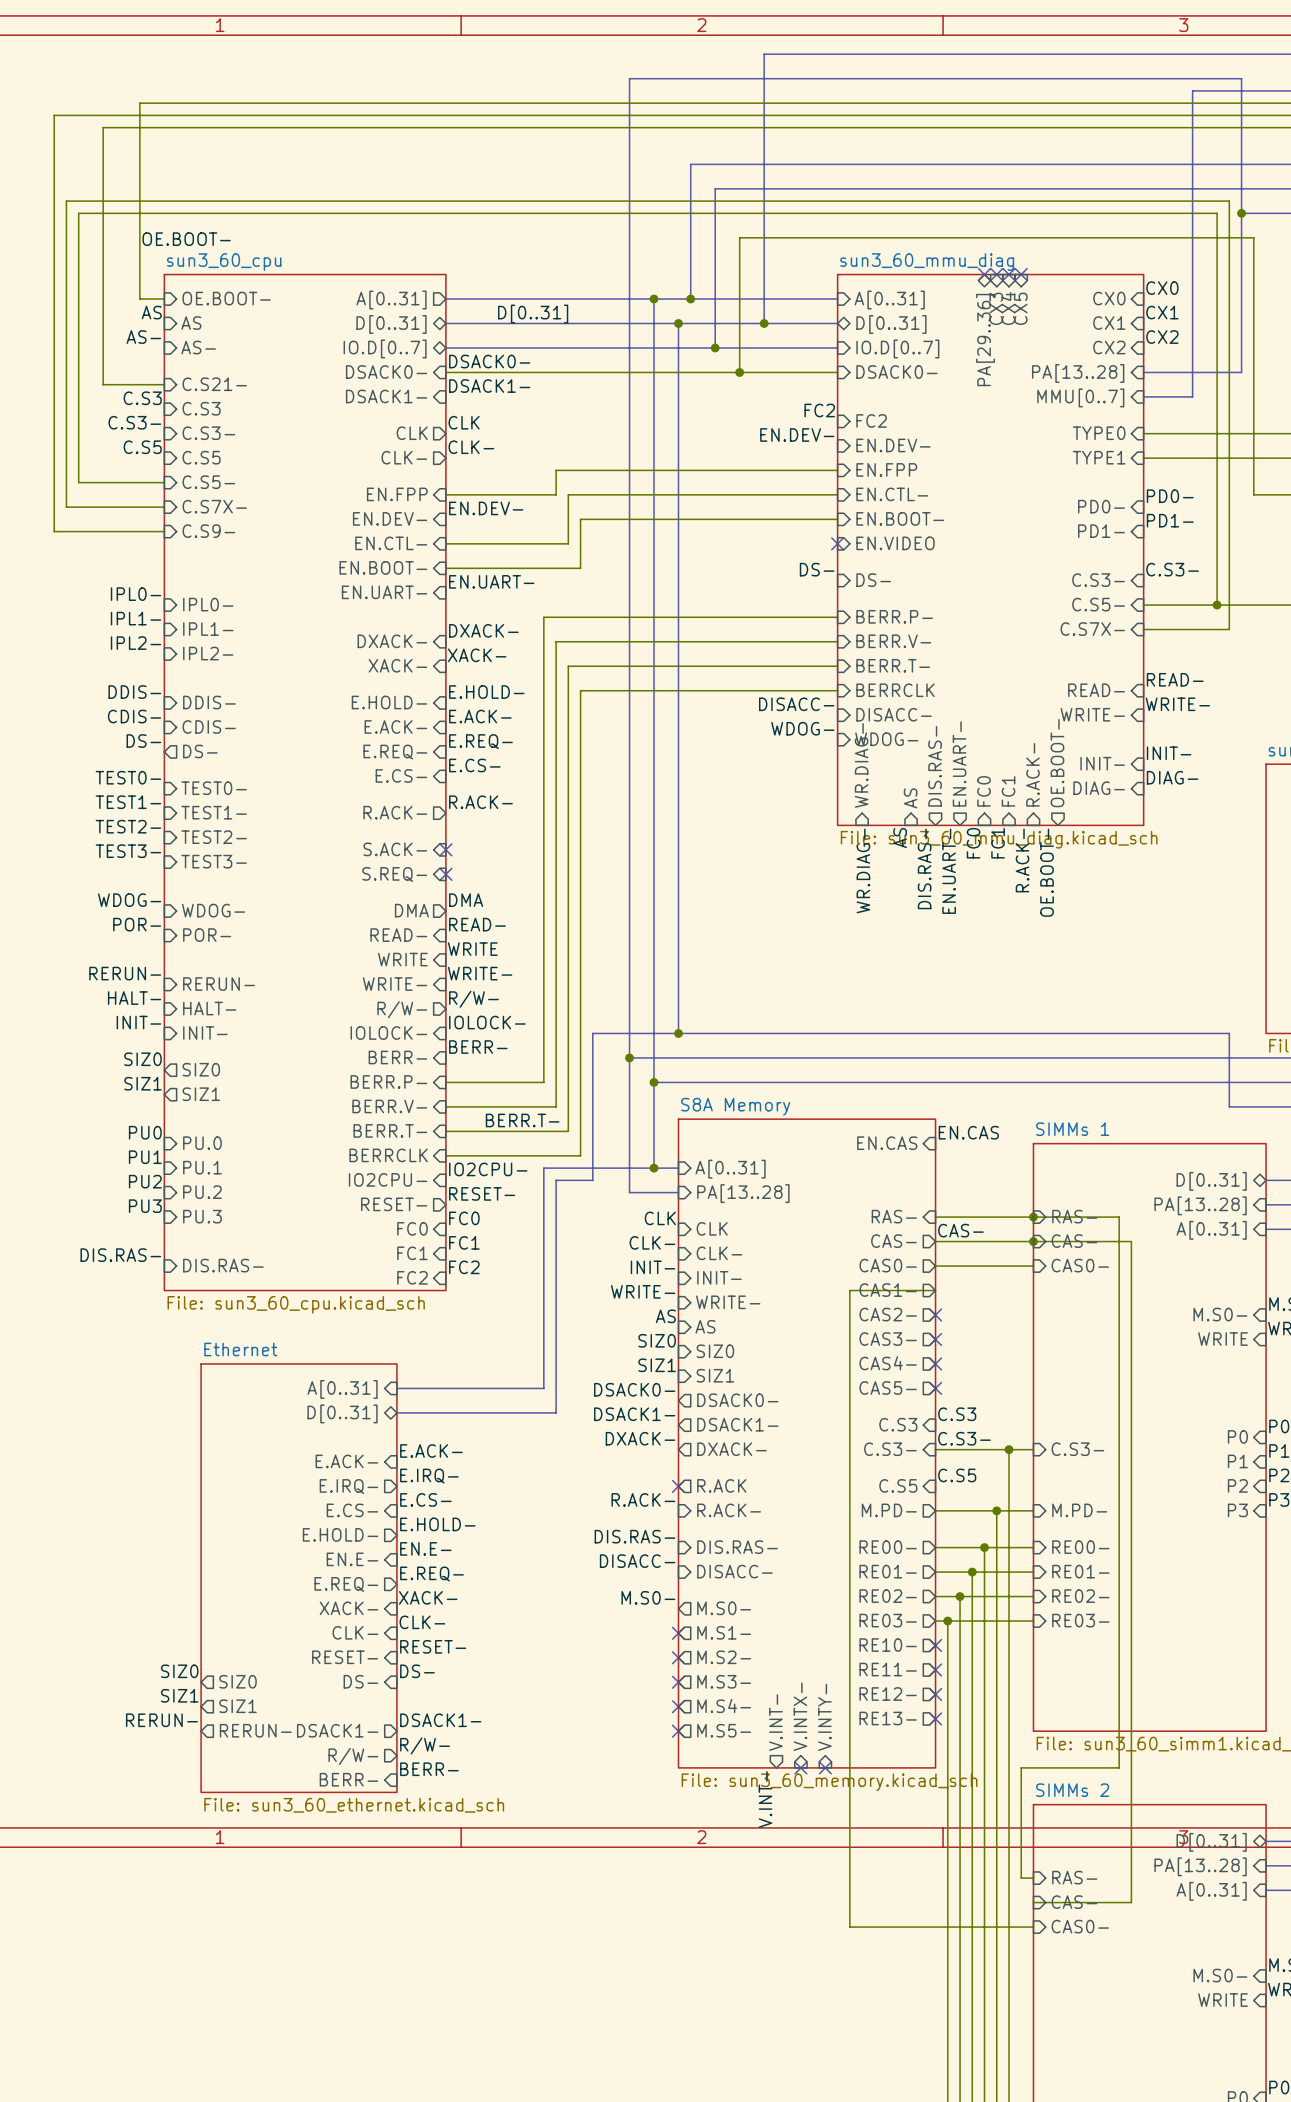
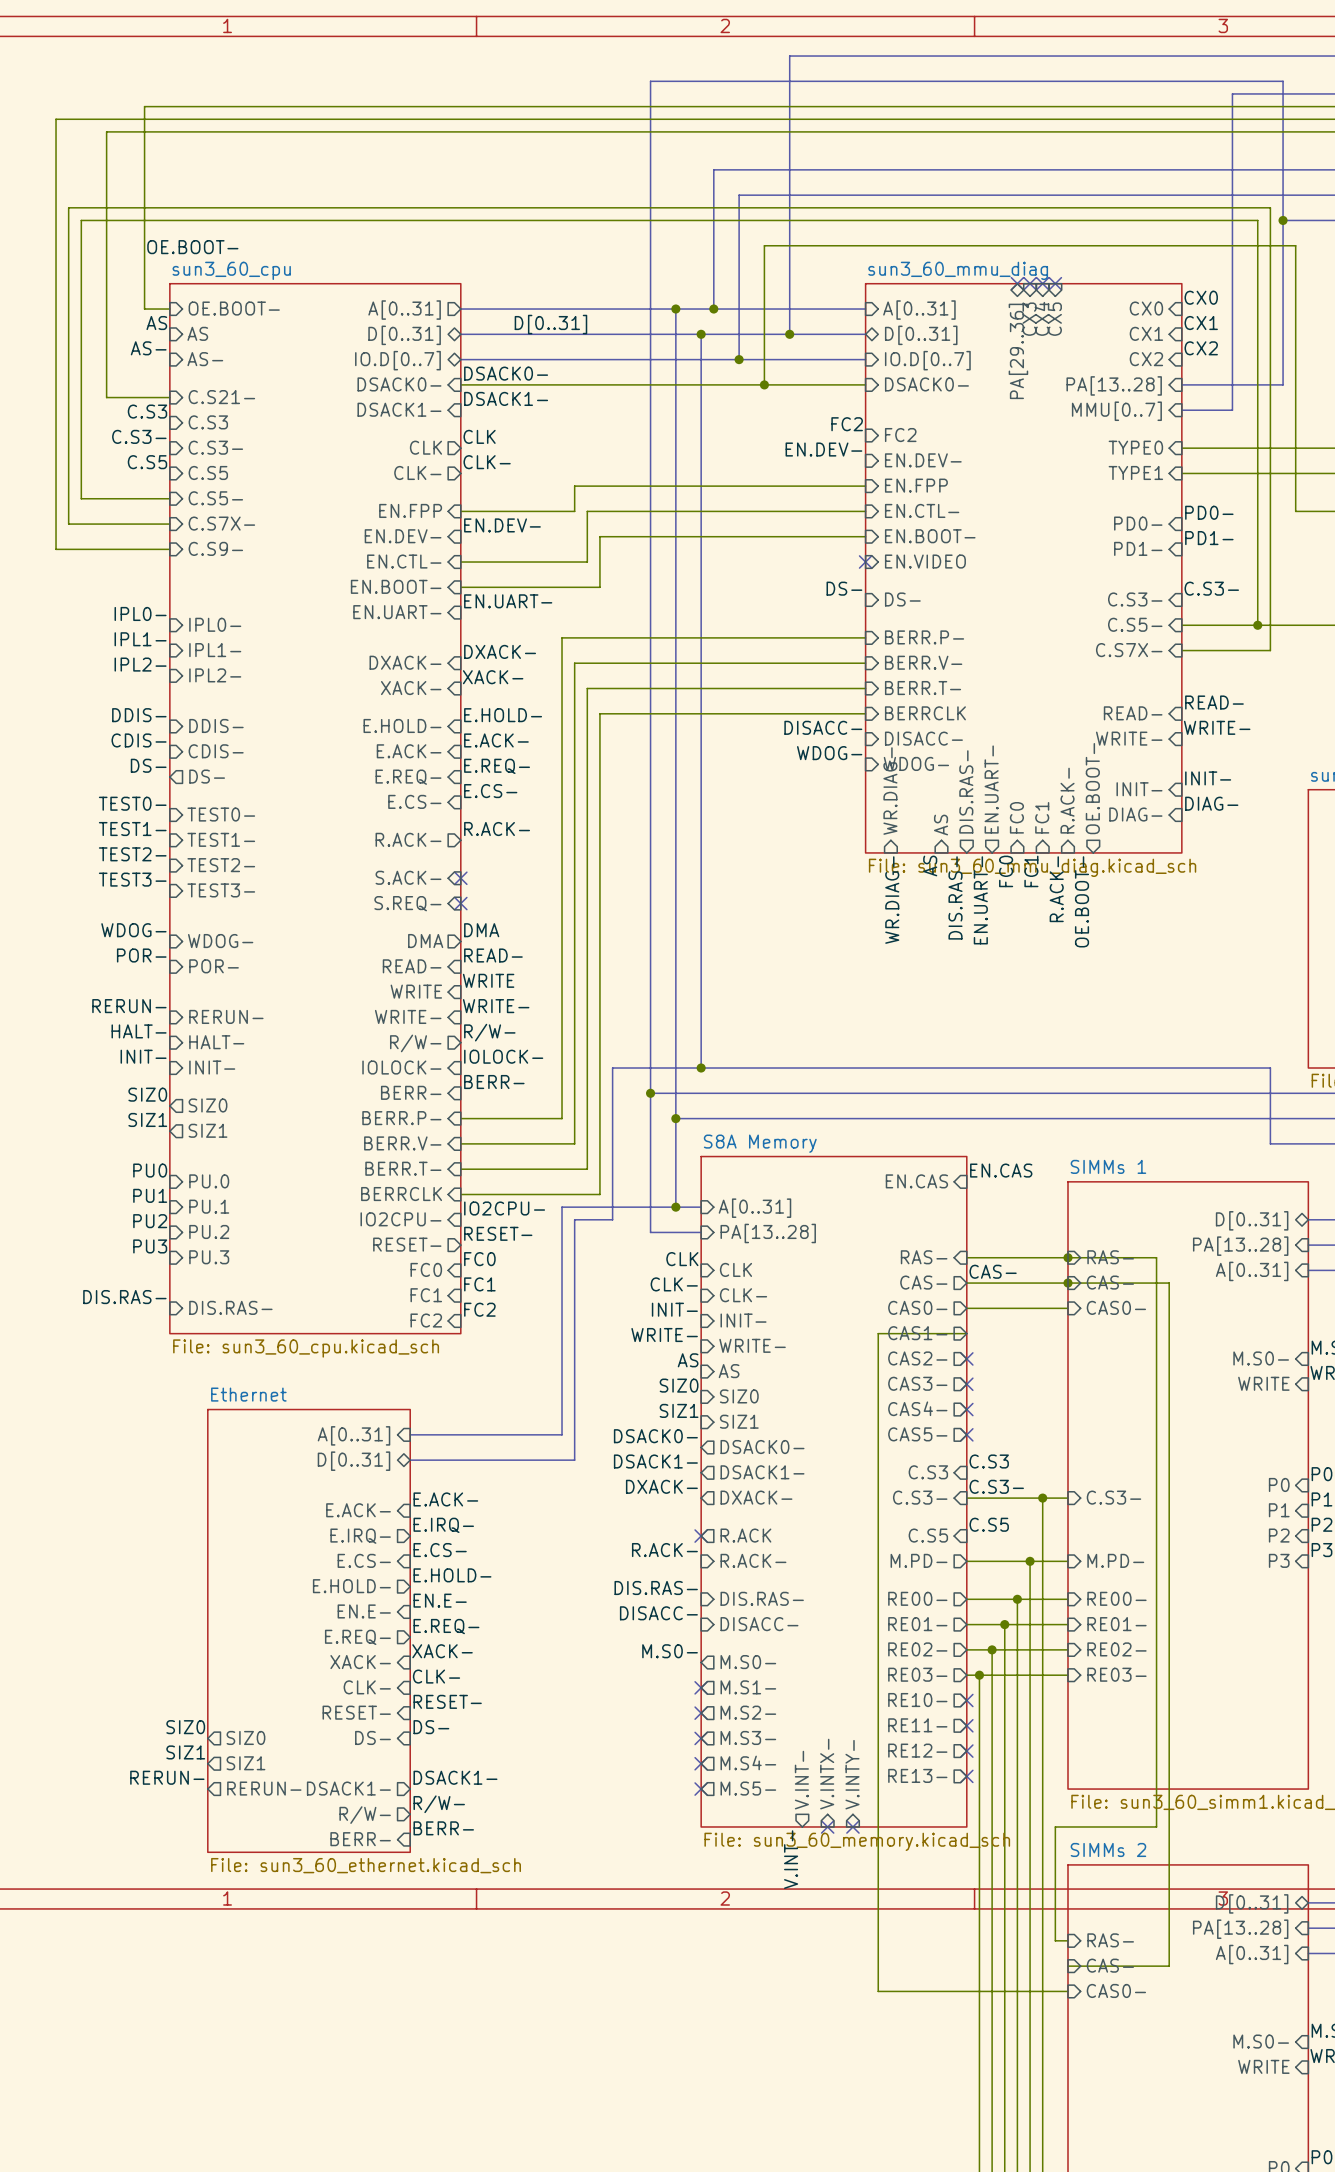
label: BERR.T- (522, 1120) -> none

